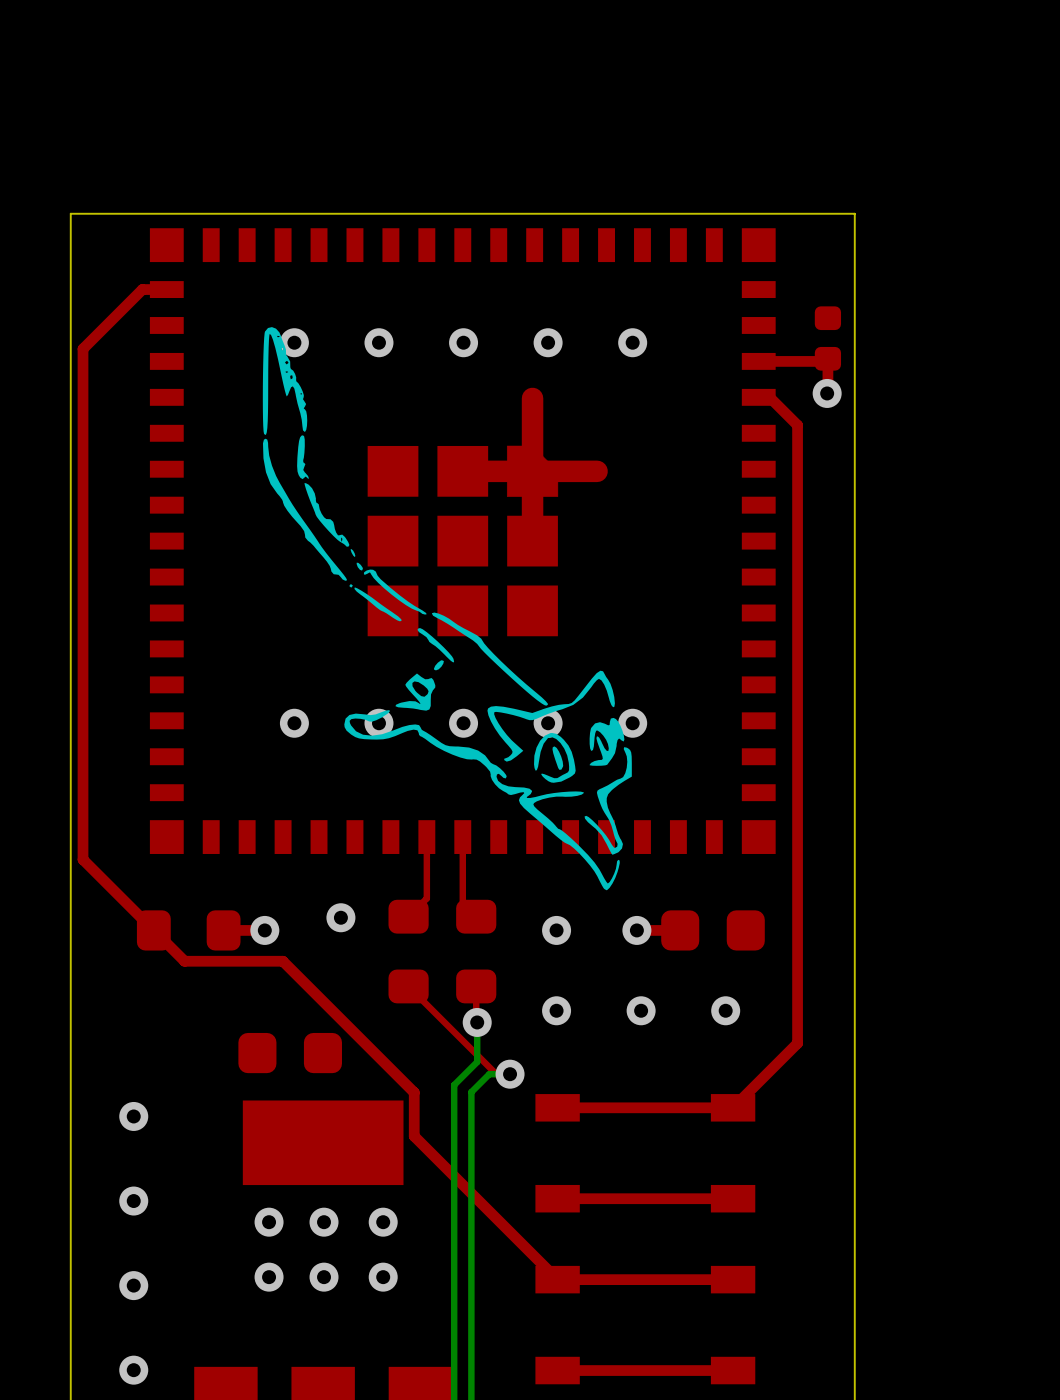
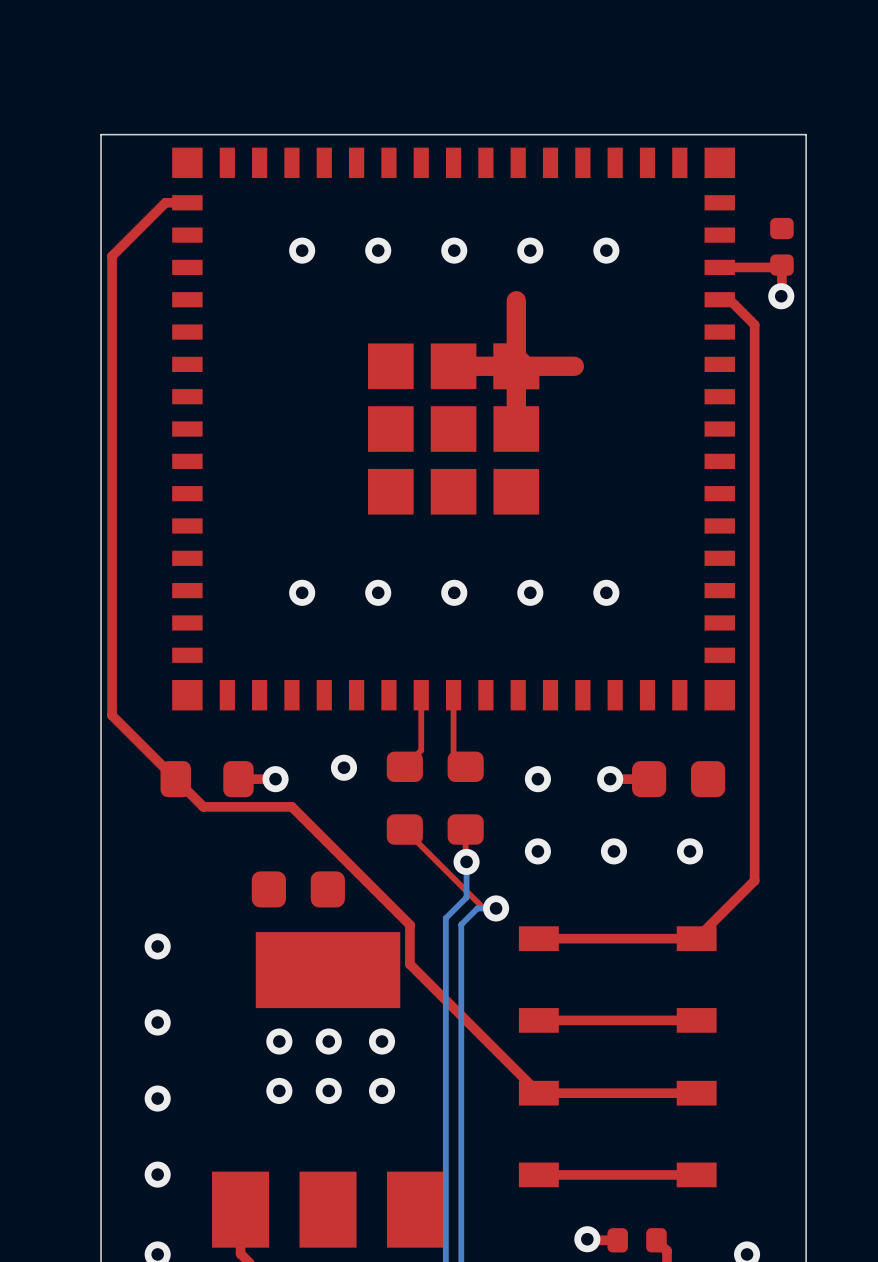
drawing: [262, 327, 632, 891] -> none

